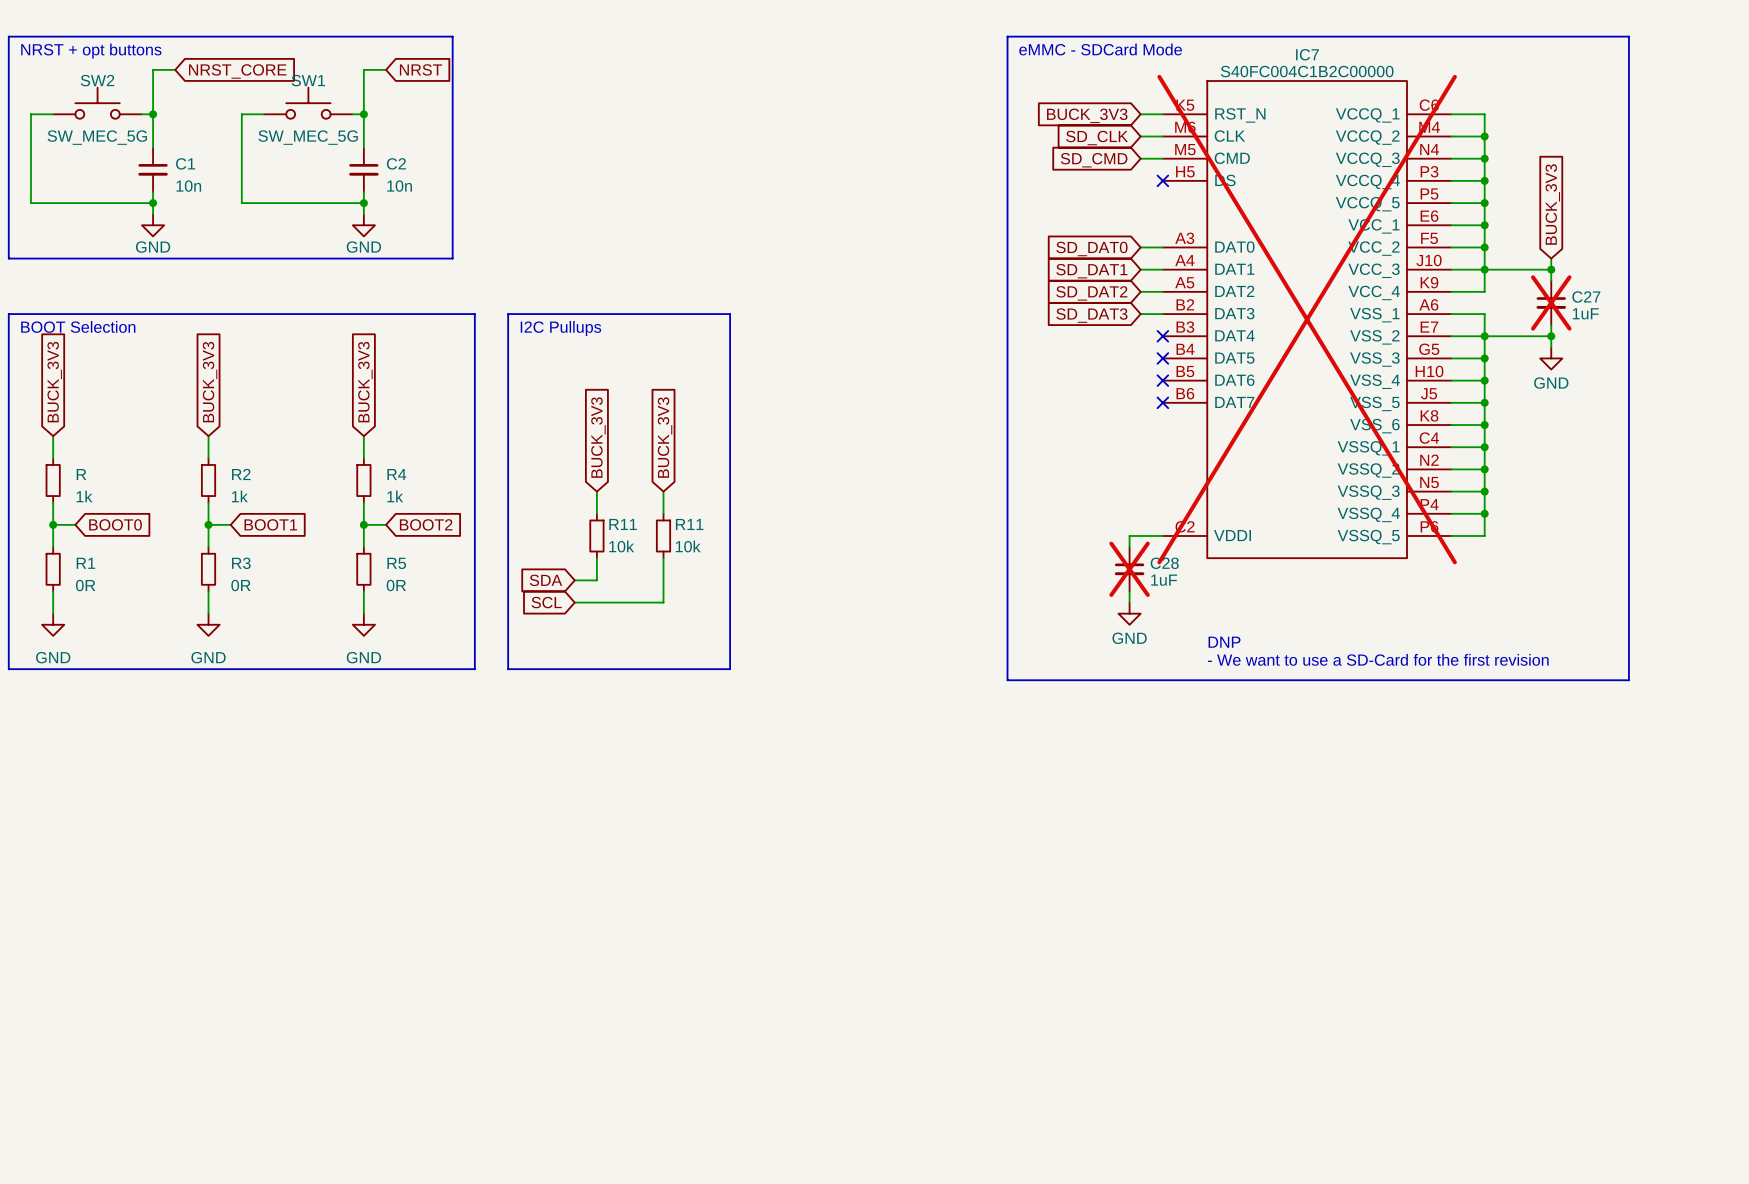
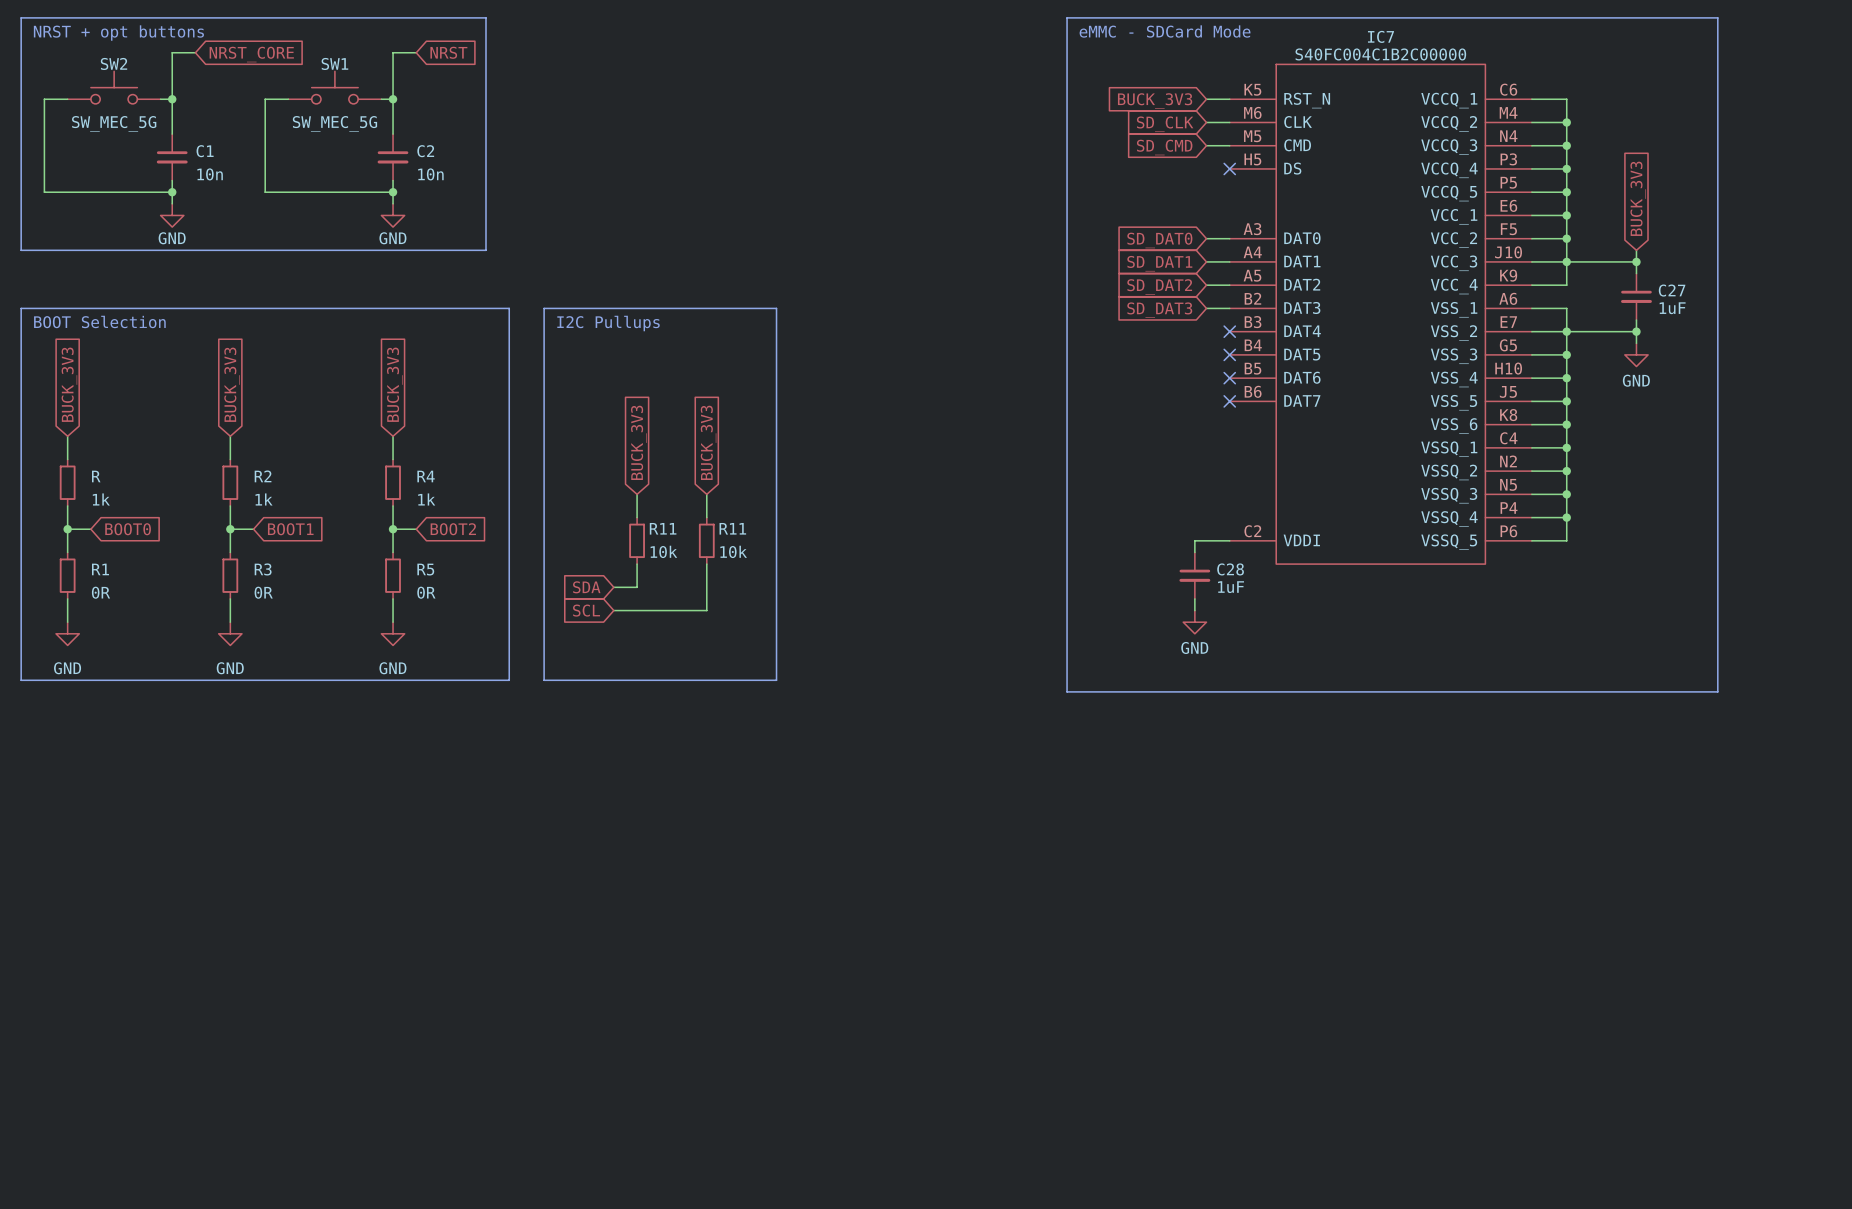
C27 do-not-place cross: (1551, 302) -> none
IC7 do-not-place cross: (1307, 319) -> none
C28 do-not-place cross: (1129, 569) -> none
text: DNP (1224, 642) -> none
text: - We want to use a SD-Card for the first revision (1378, 659) -> none

